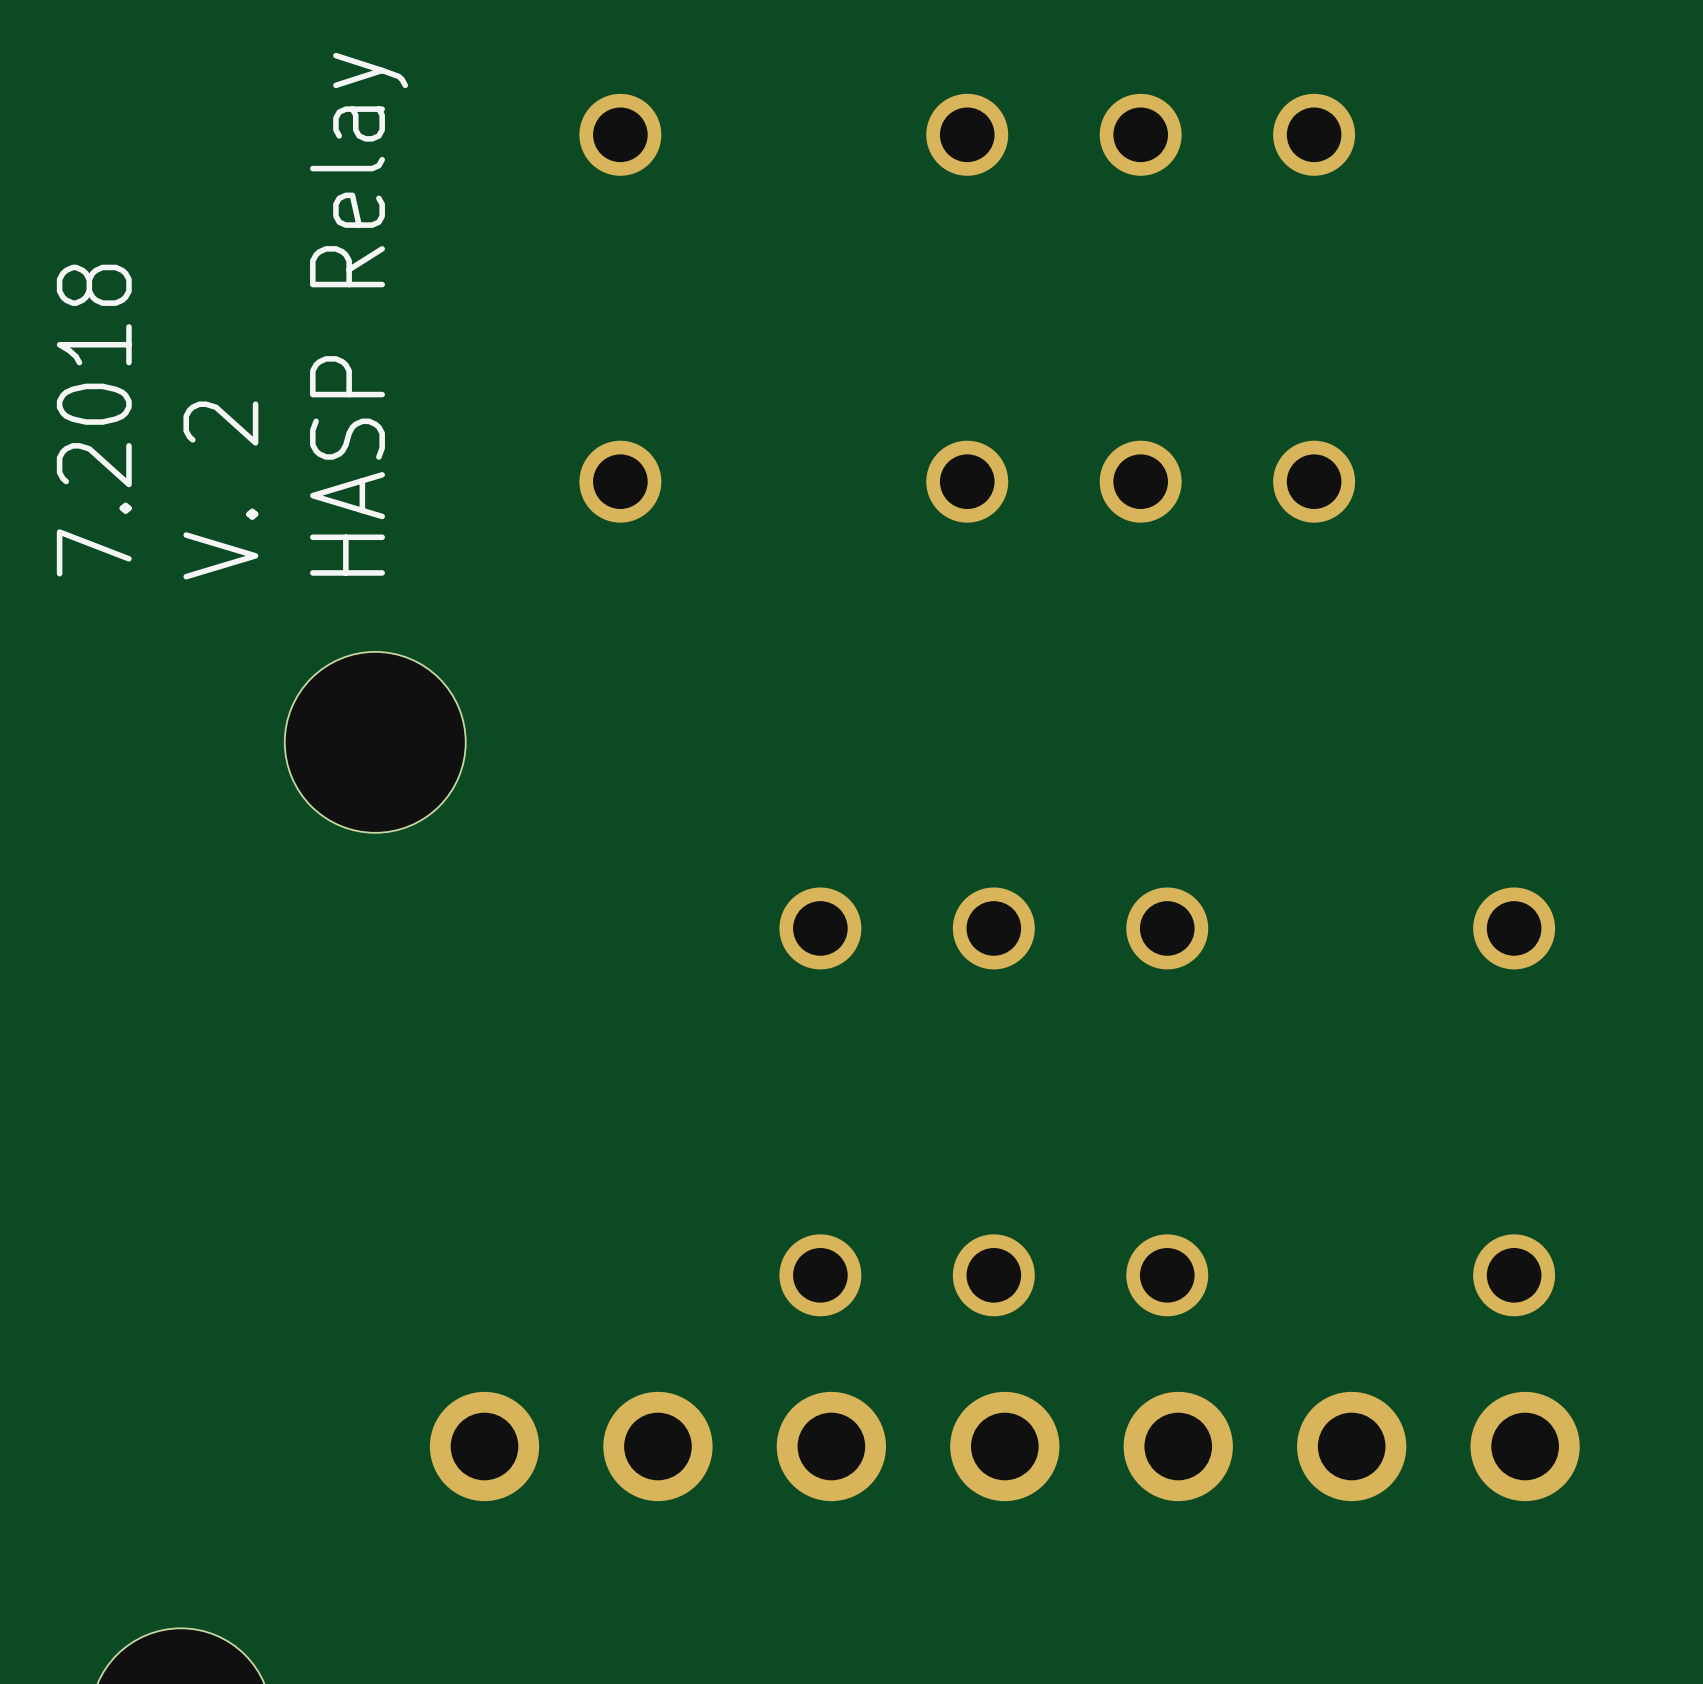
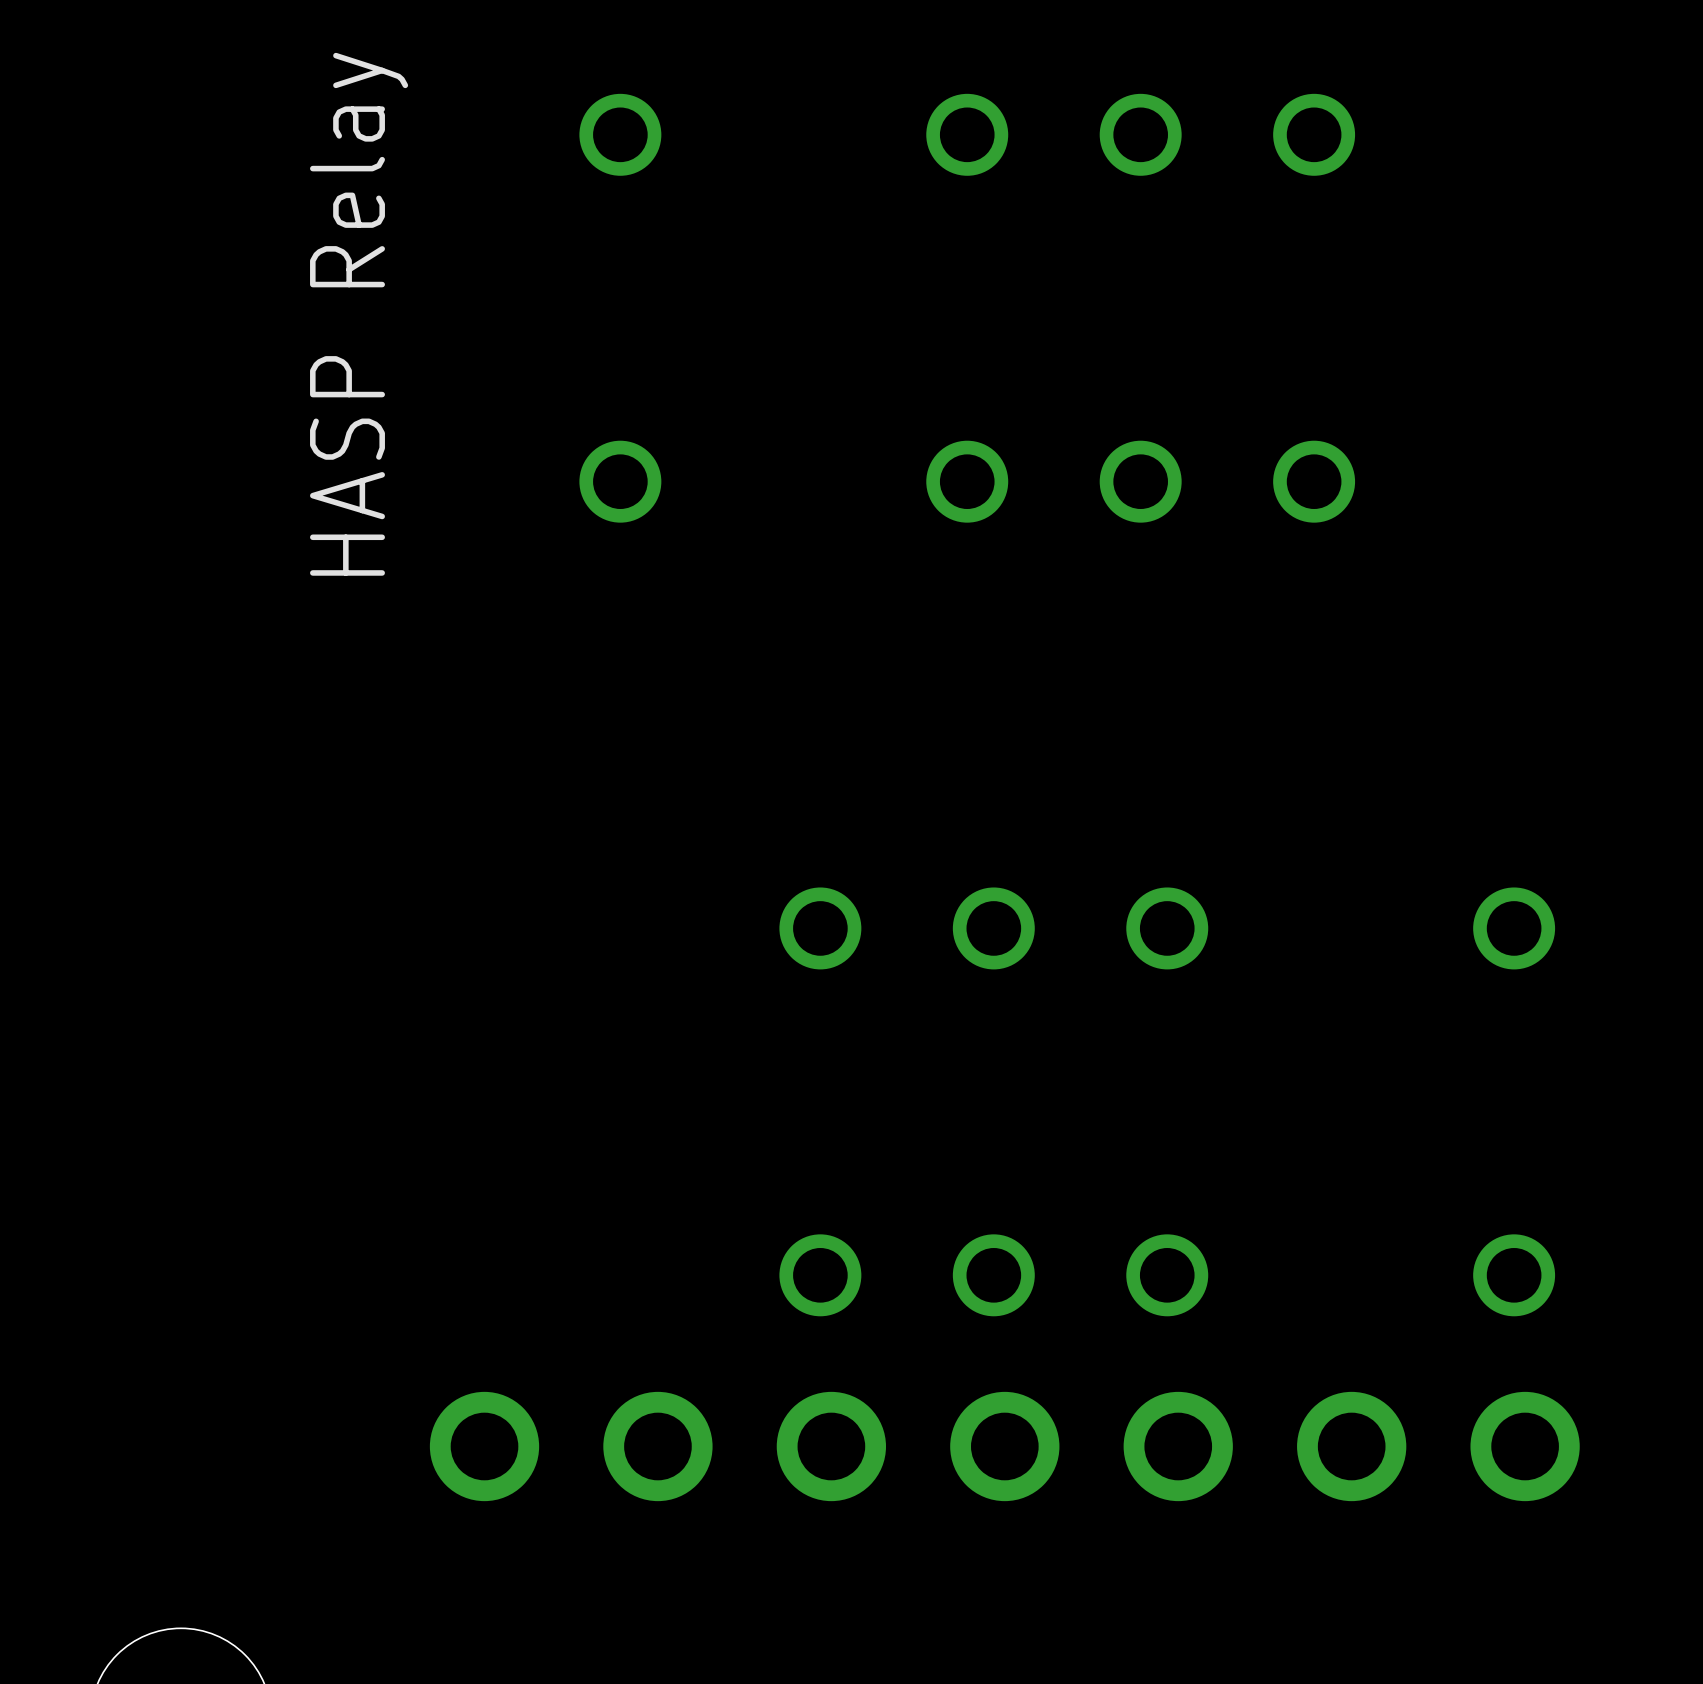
text: 7.2018 (94, 420) -> none
text: V. 2 (220, 490) -> none
hole: (375, 742) -> none

